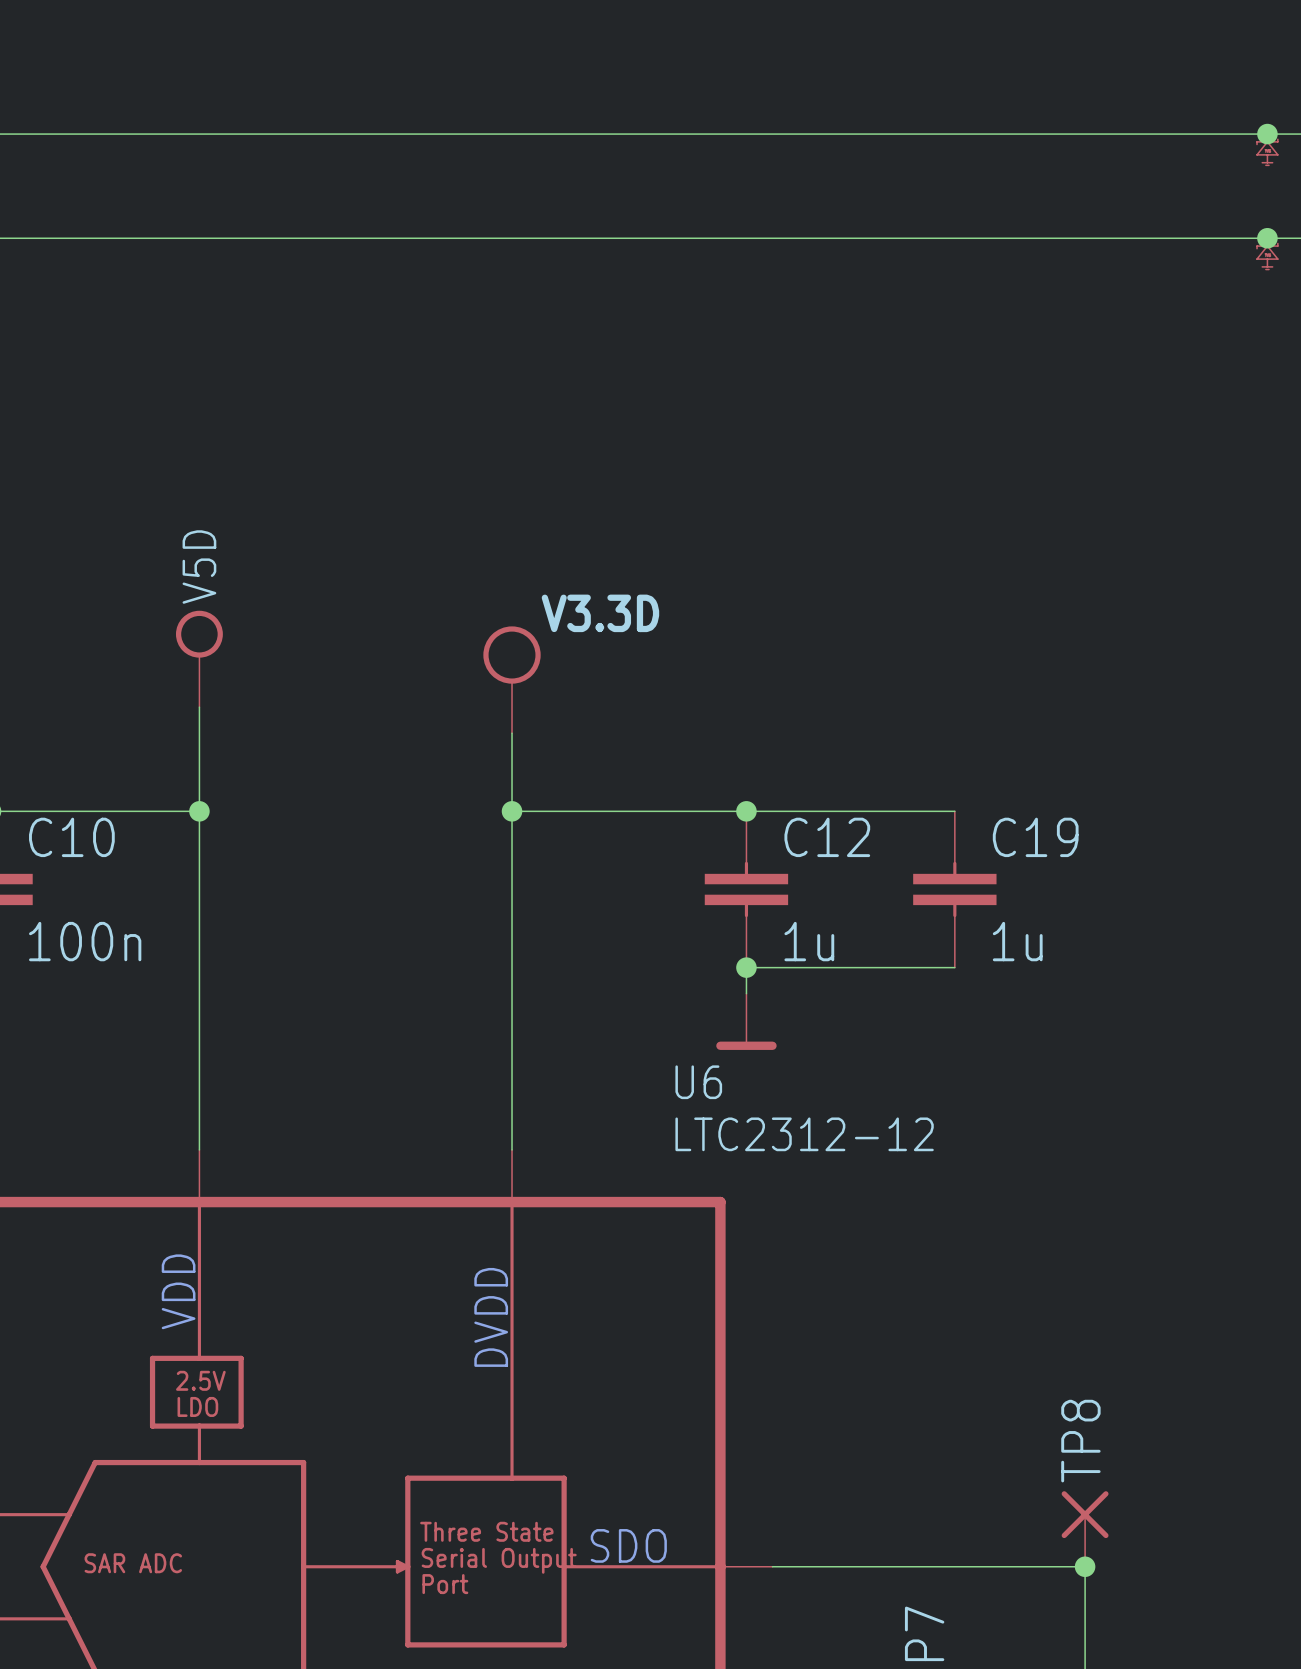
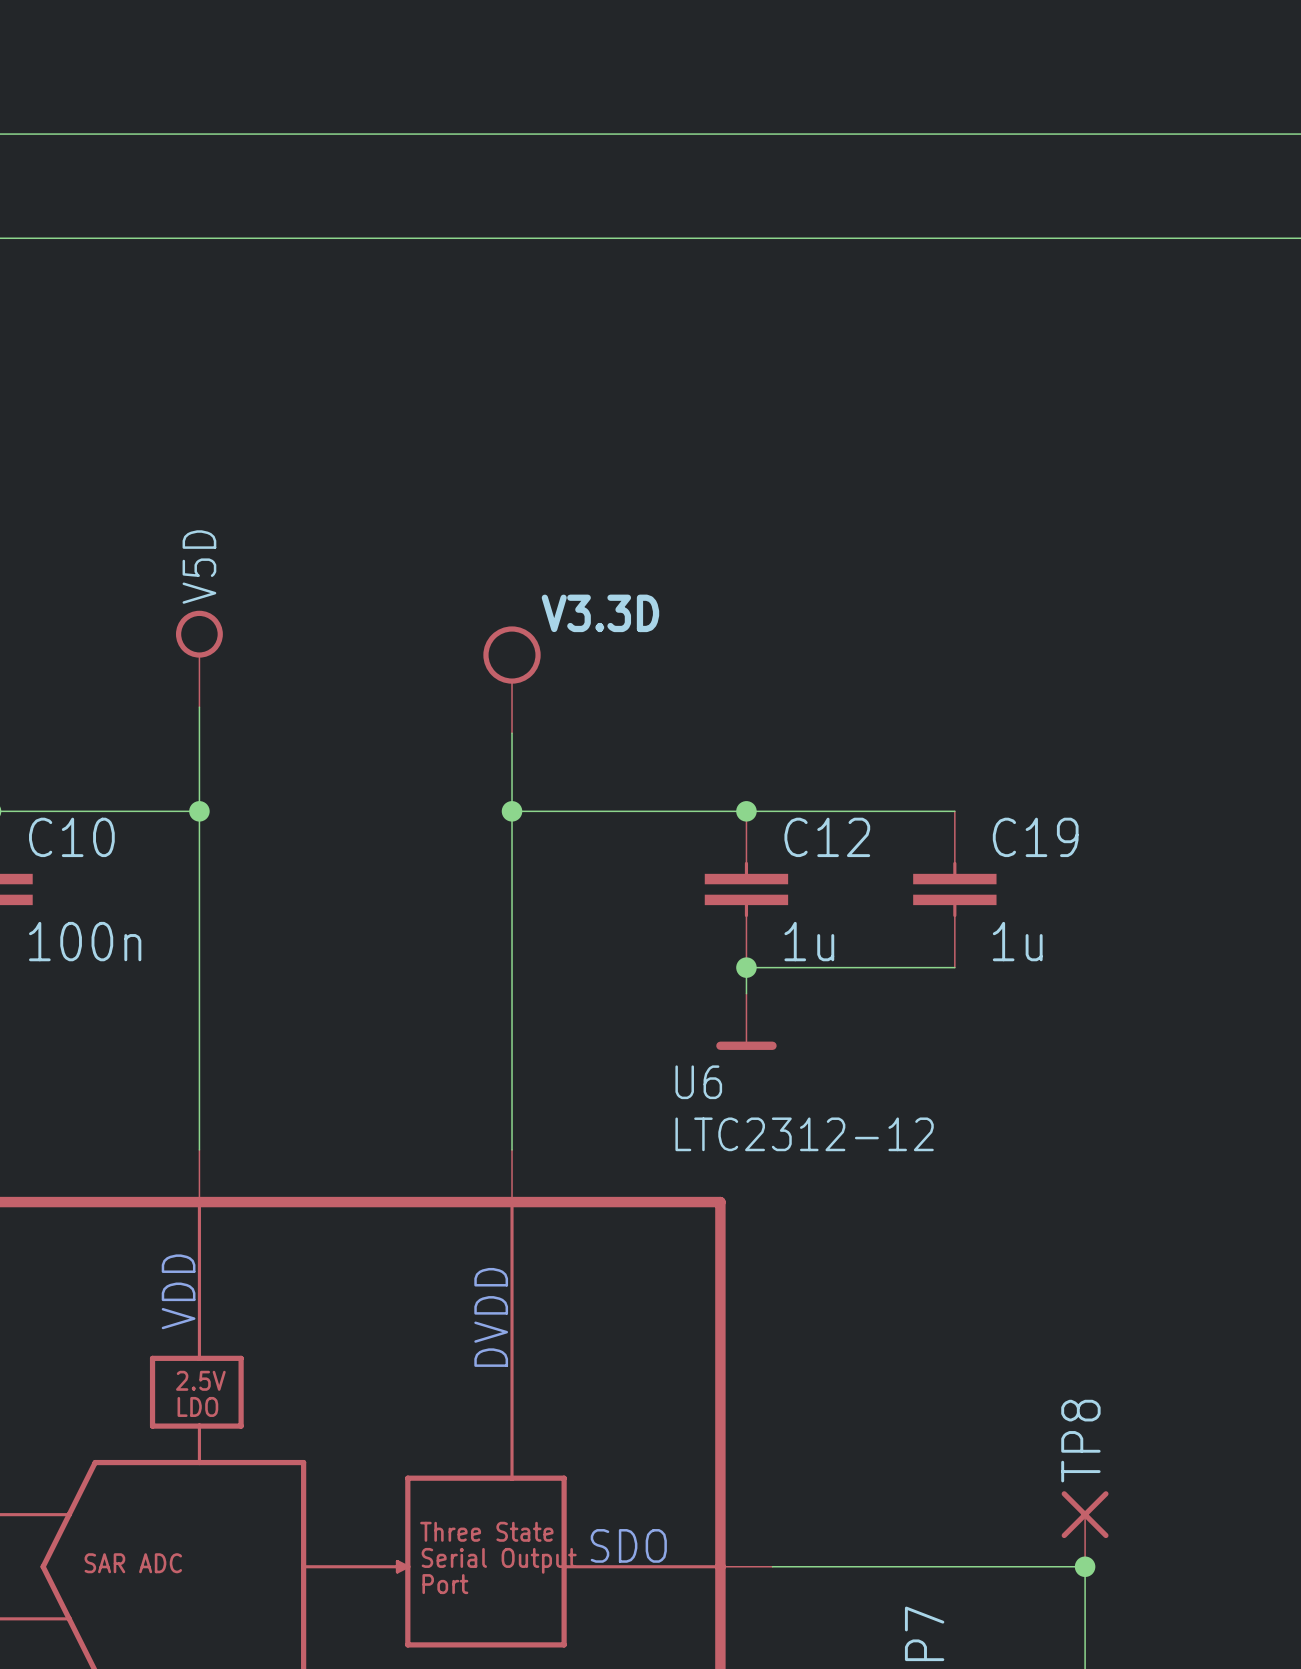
junction: (1267, 134) -> none
part: (1267, 149) -> none
junction: (1267, 238) -> none
part: (1267, 253) -> none

